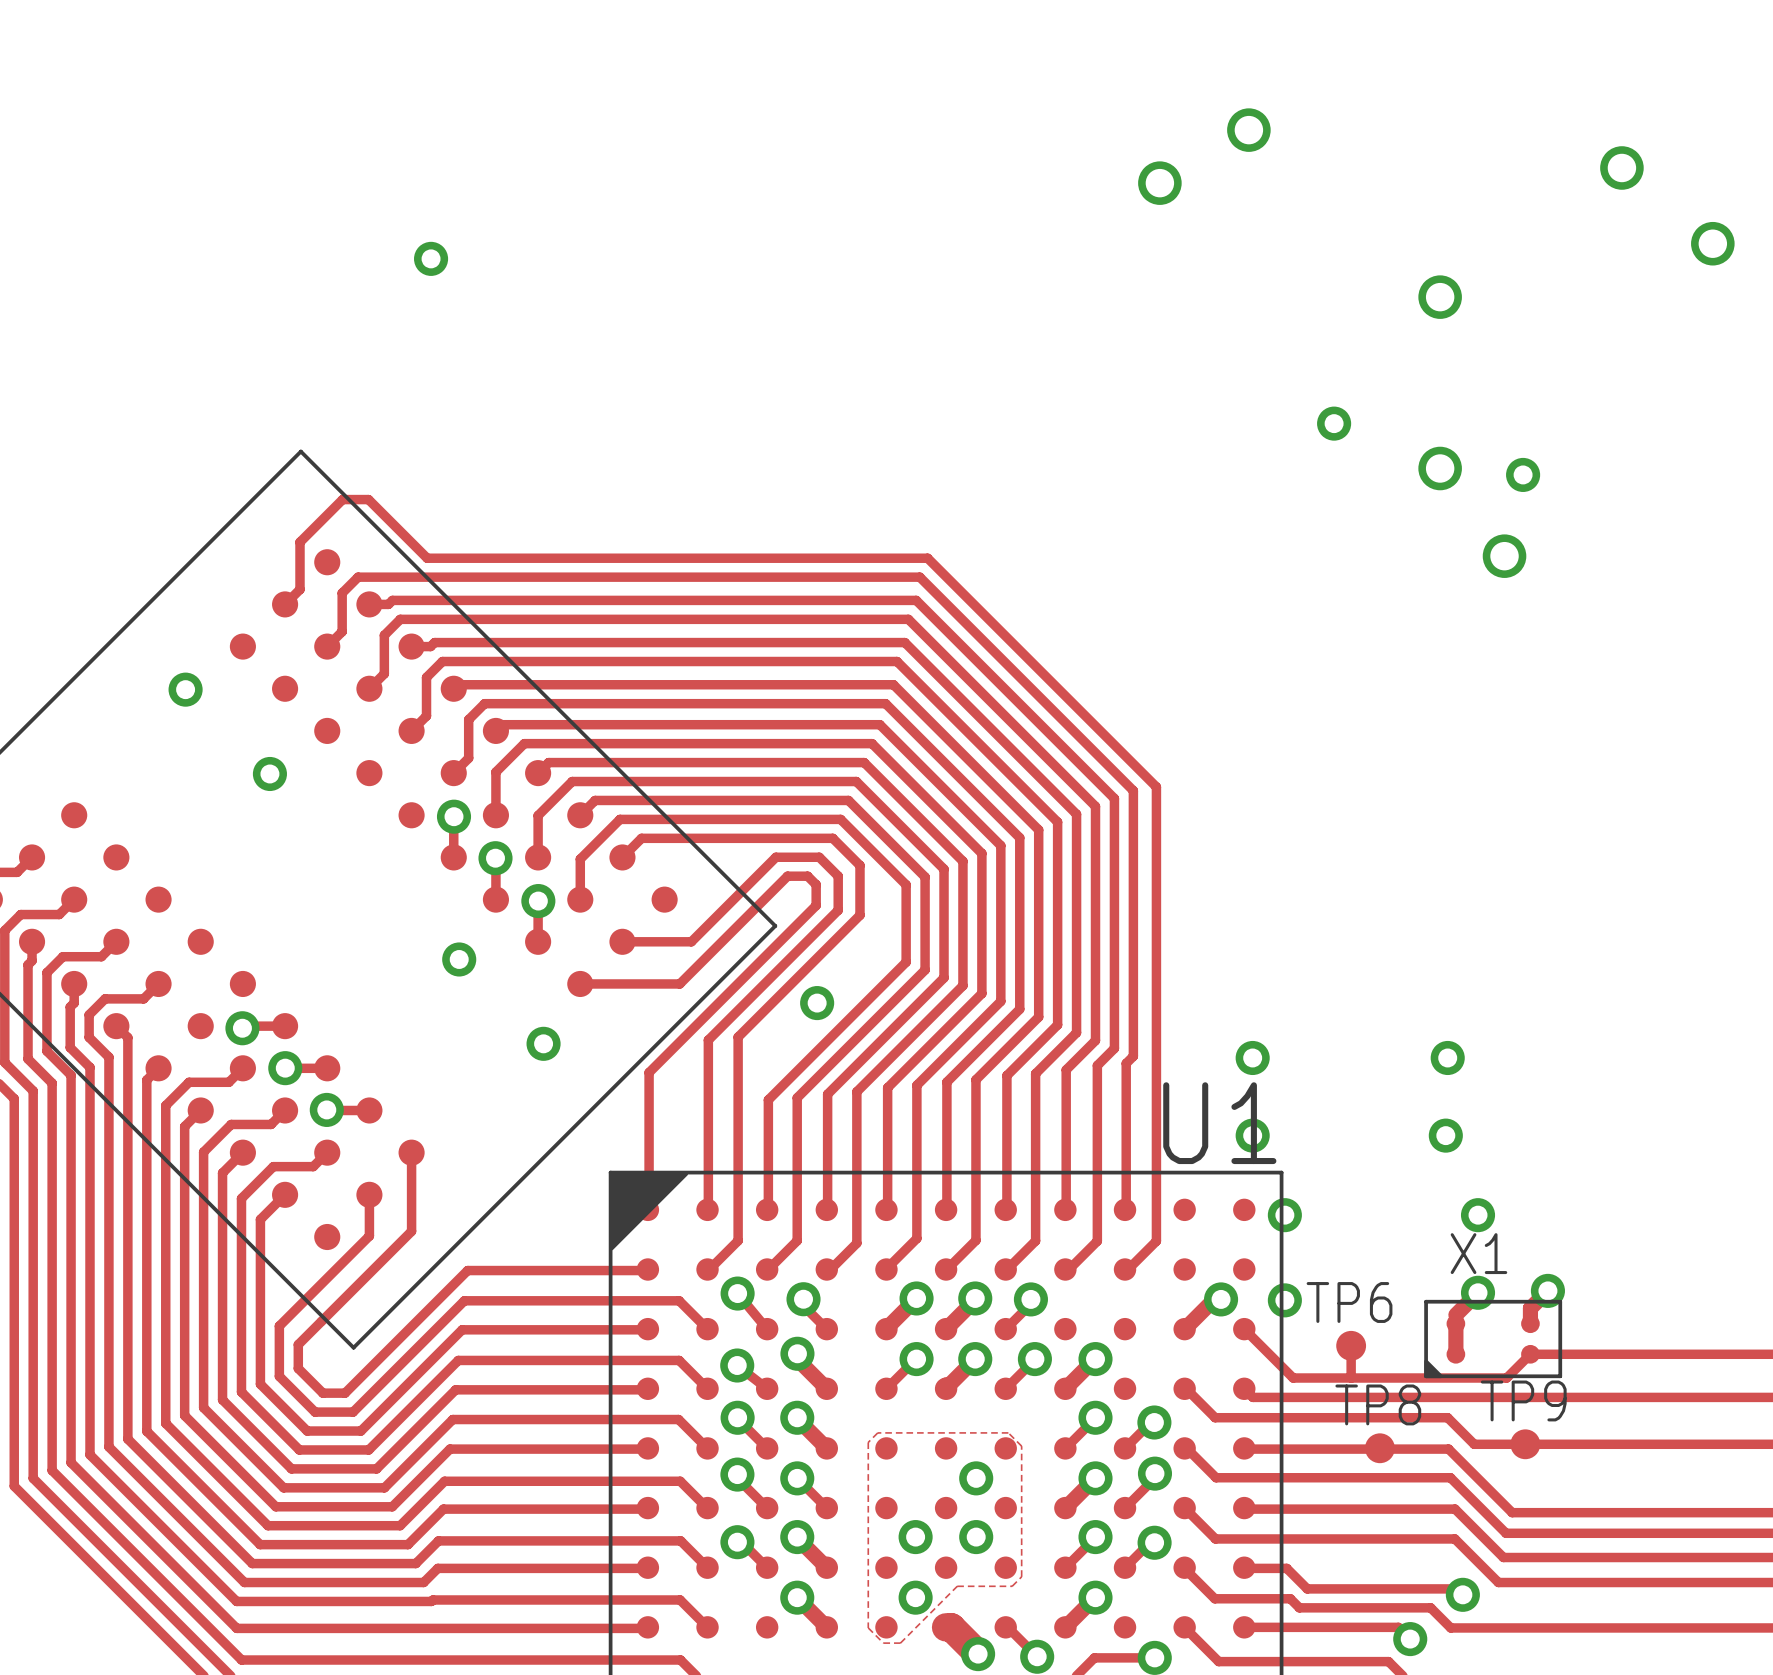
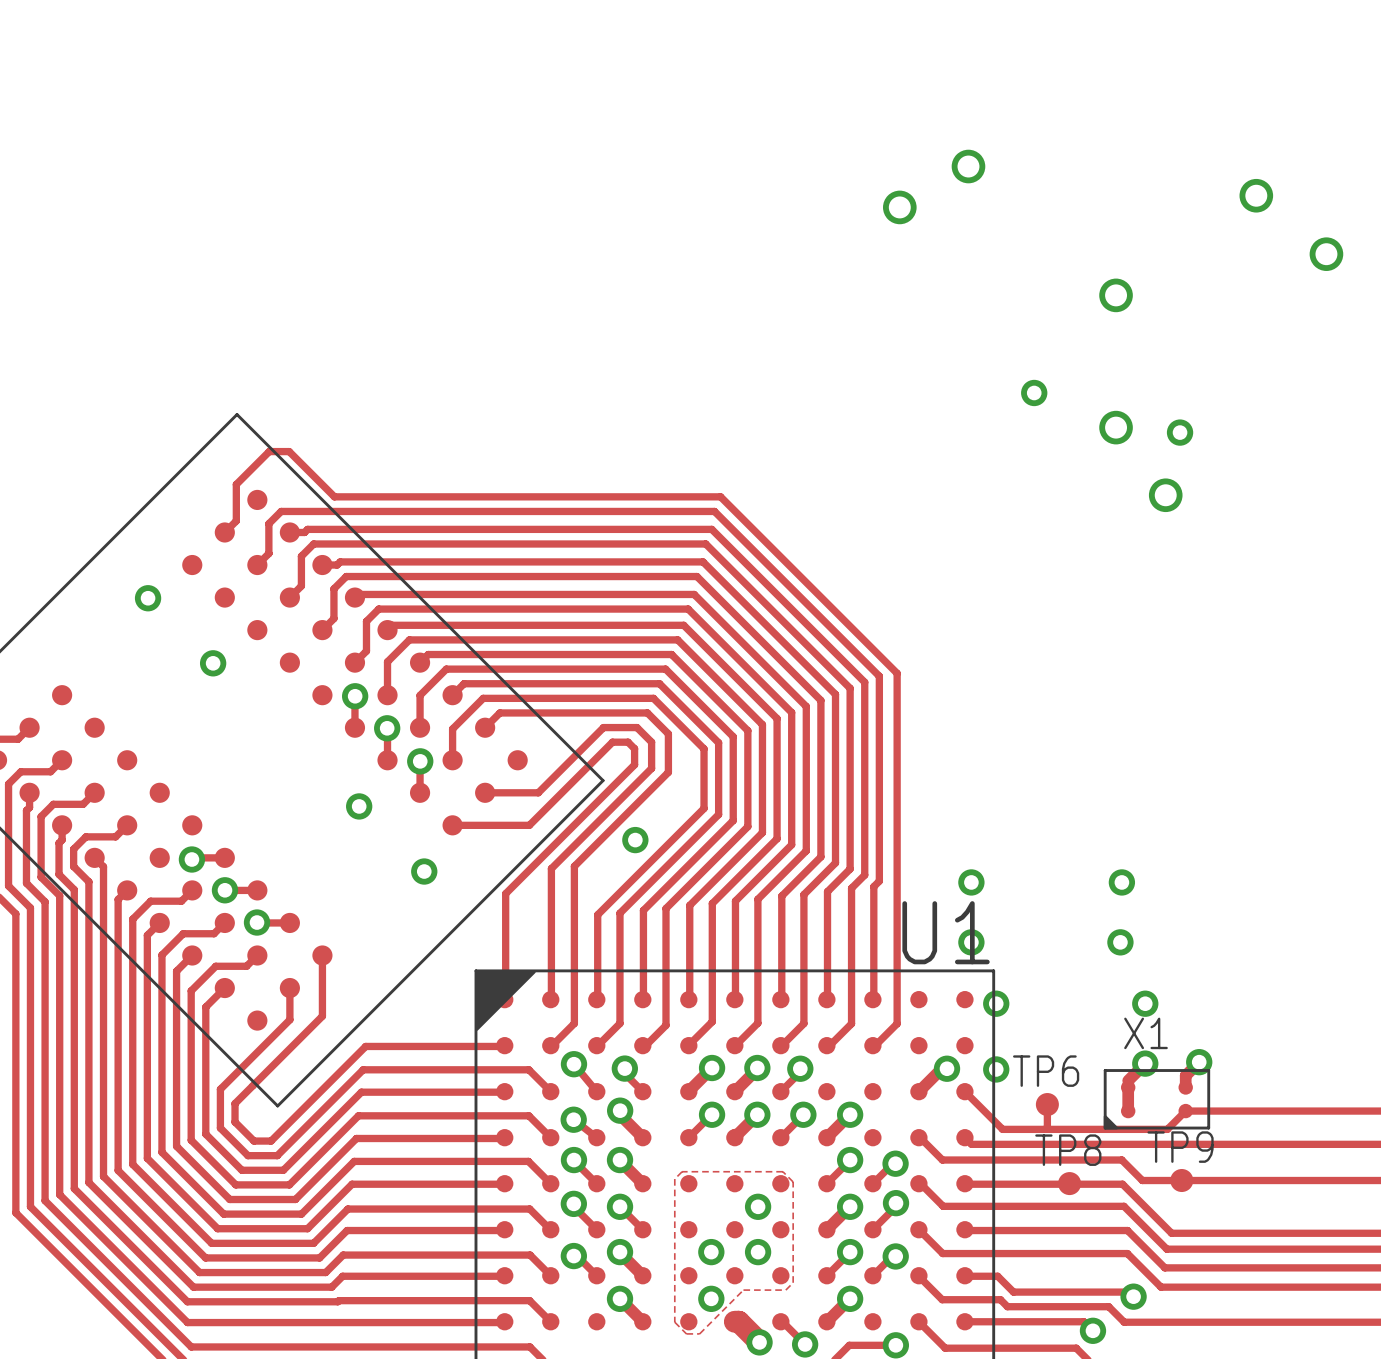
via: (431, 258) -> none

